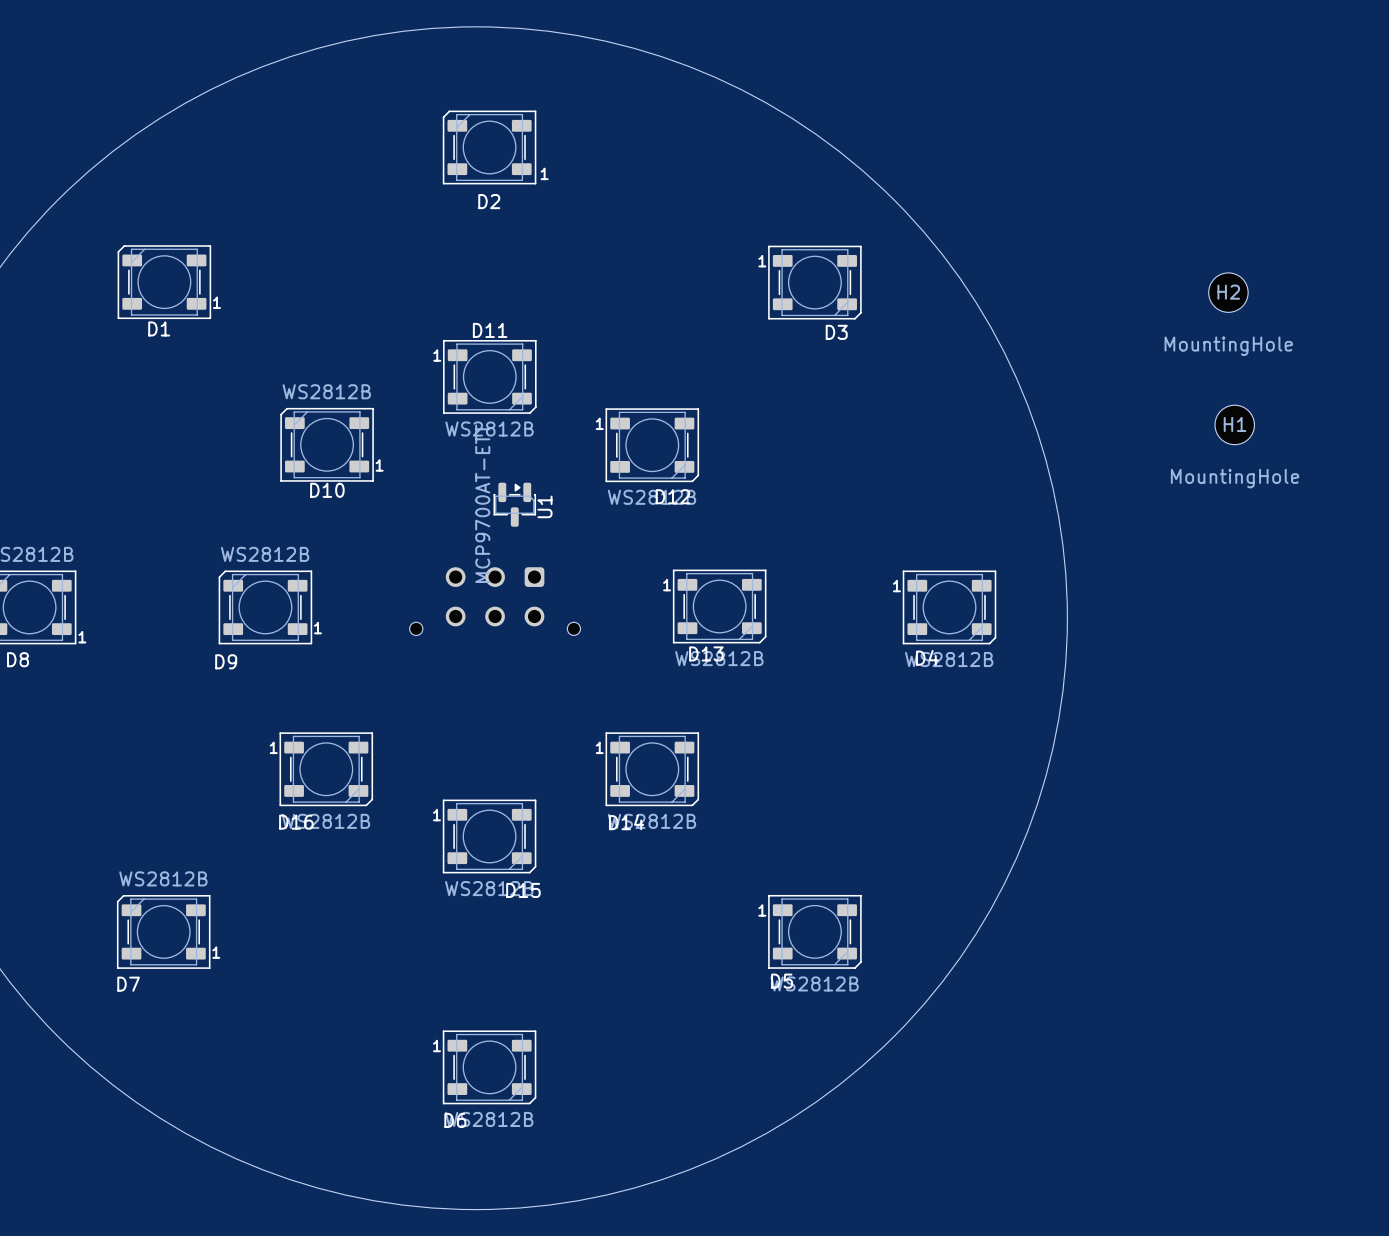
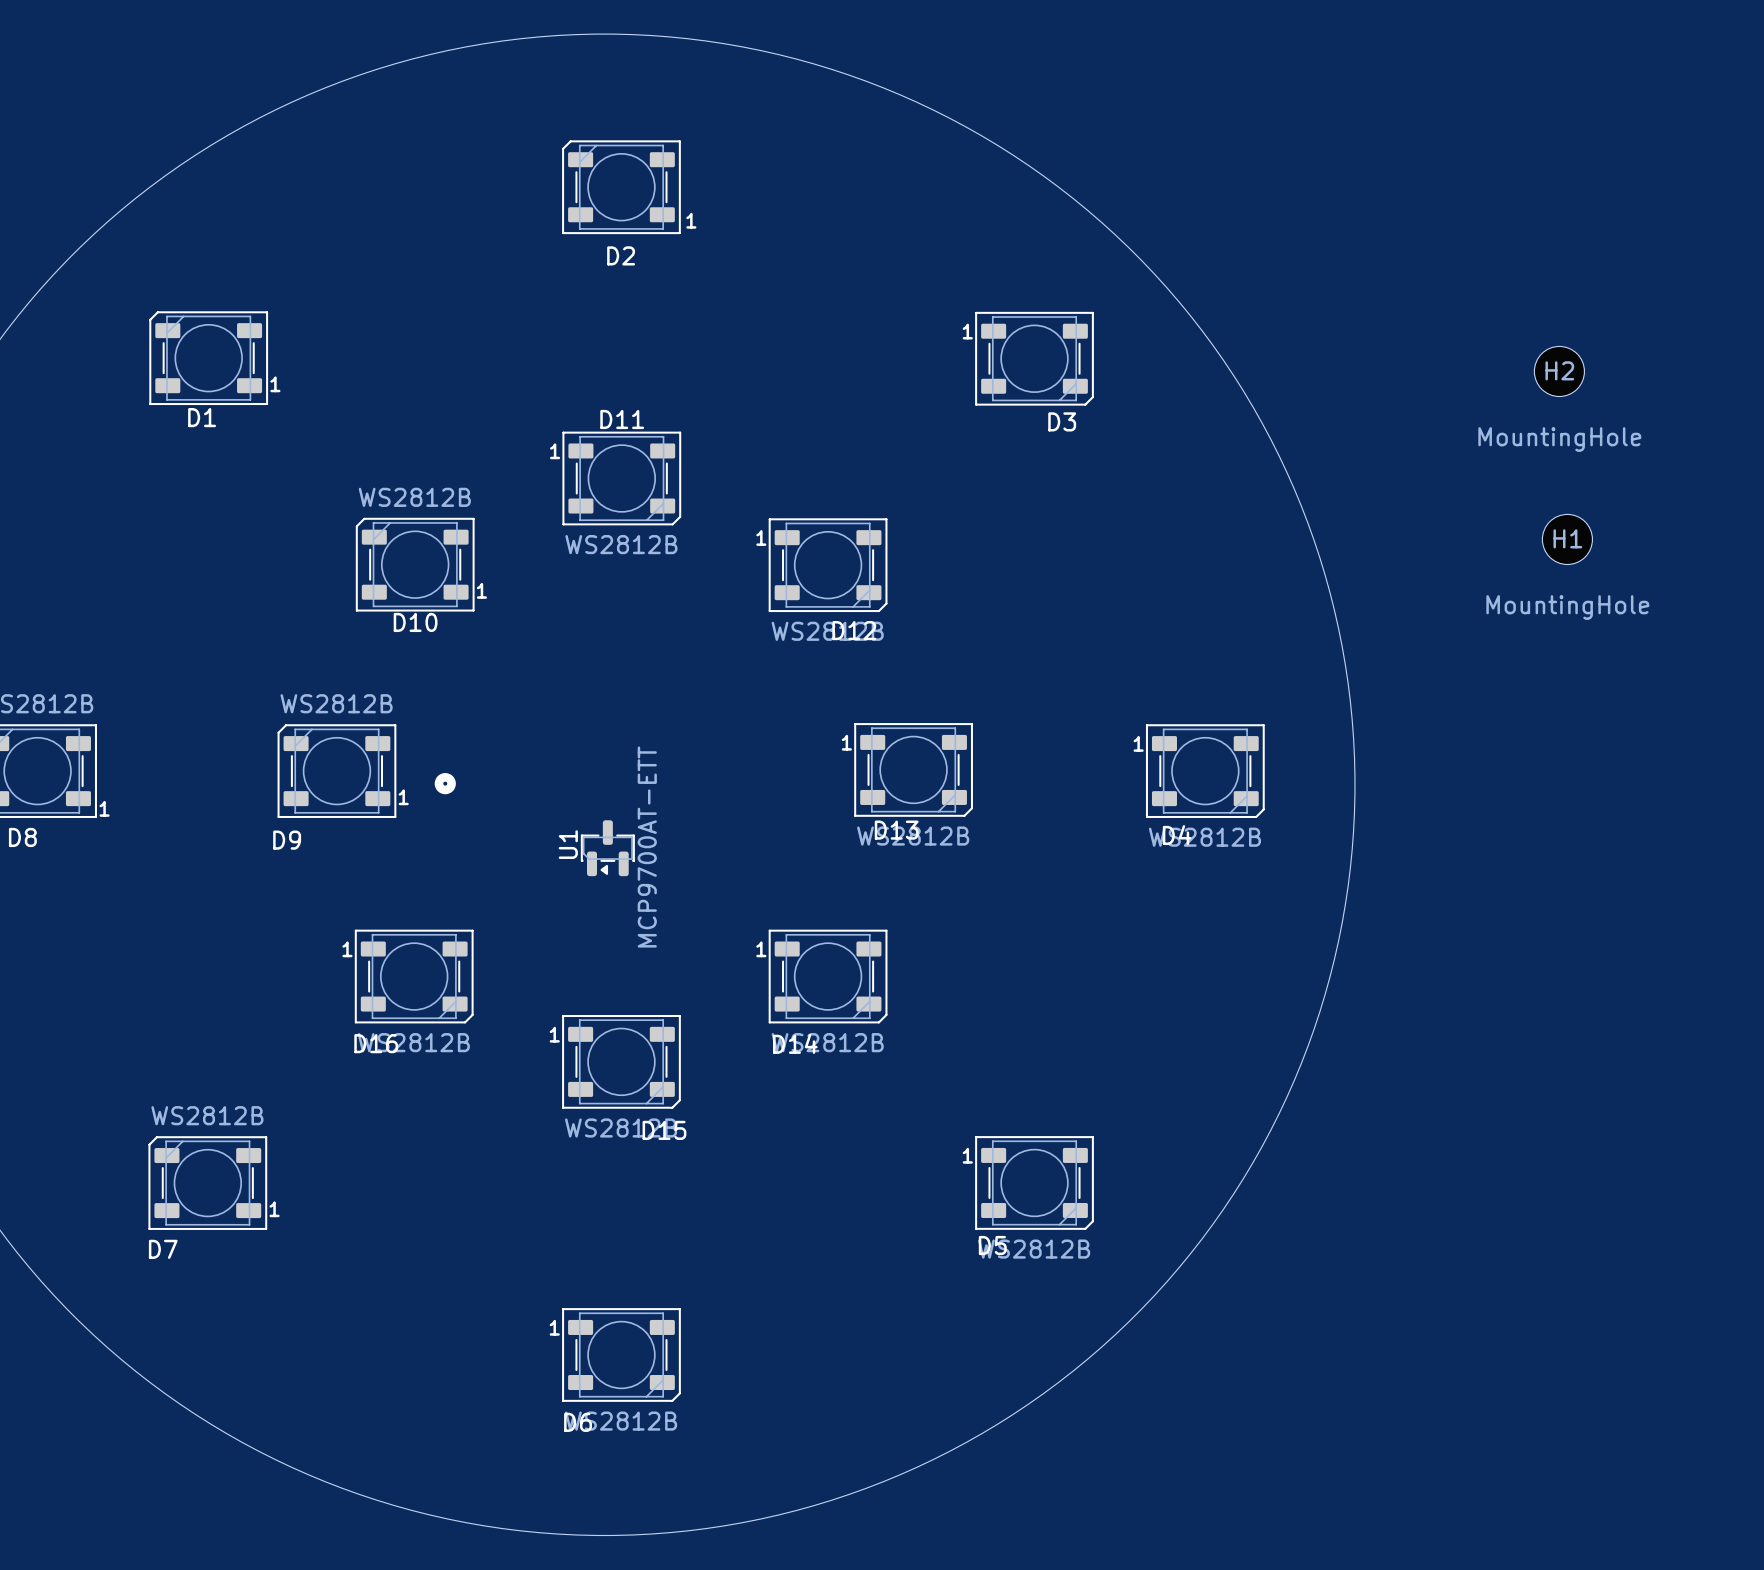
U1 rotation: 0° (514, 504) -> 180° (607, 848)
U1 position: (514, 504) -> (607, 848)
part: (495, 601) -> none
part: none -> (445, 783)

